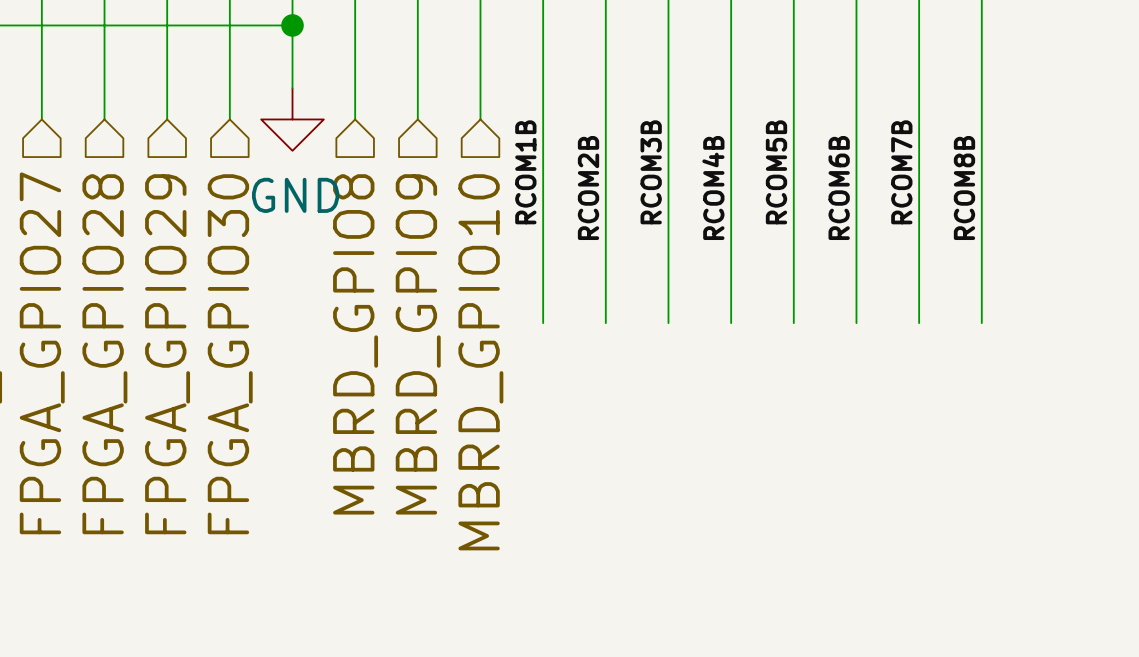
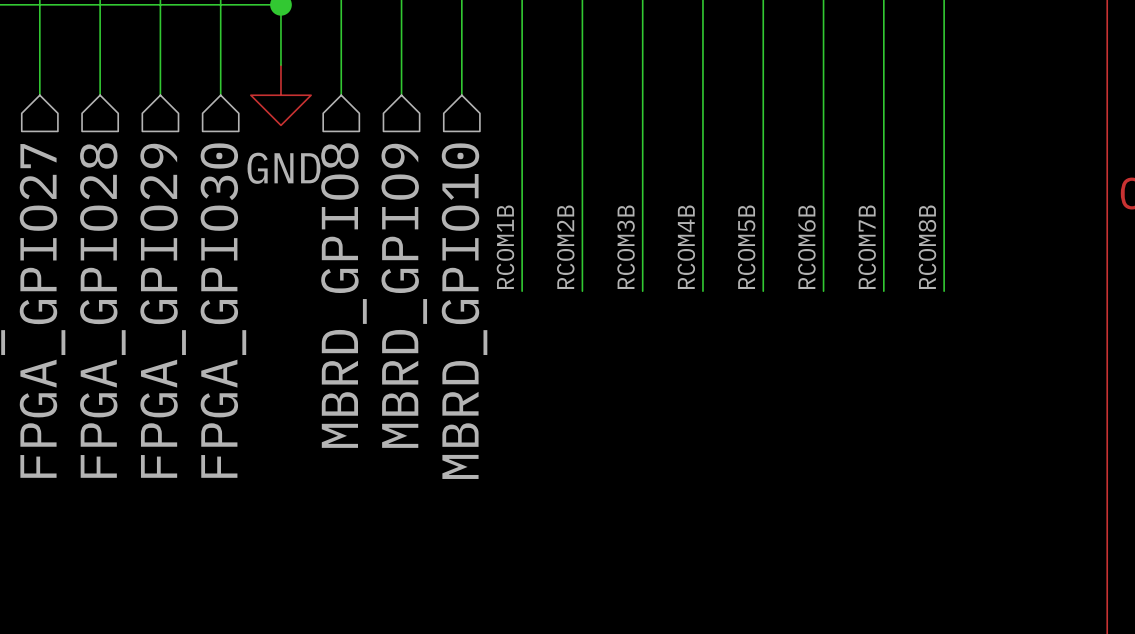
label position: RCOM1B (525, 172) -> RCOM1B (505, 247)
label position: RCOM3B (651, 172) -> RCOM3B (626, 247)
label position: RCOM5B (776, 172) -> RCOM5B (746, 247)
label position: RCOM7B (901, 172) -> RCOM7B (867, 247)
label position: RCOM2B (588, 188) -> RCOM2B (565, 247)
label position: RCOM4B (713, 188) -> RCOM4B (686, 247)
label position: RCOM6B (839, 188) -> RCOM6B (806, 247)
label position: RCOM8B (964, 188) -> RCOM8B (927, 247)

